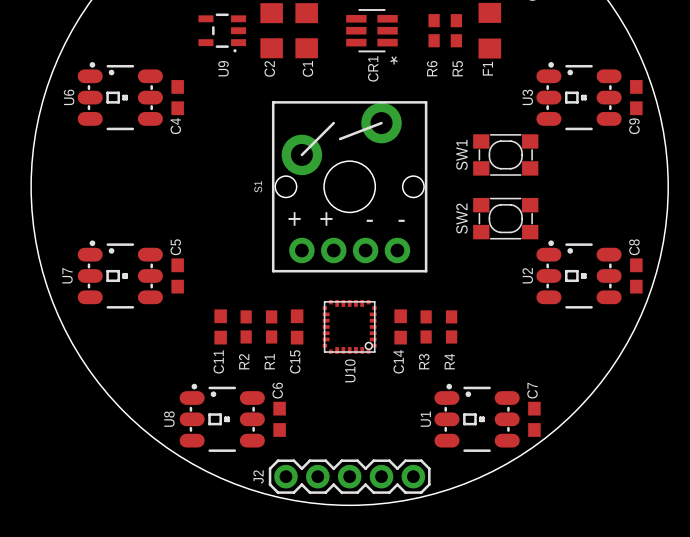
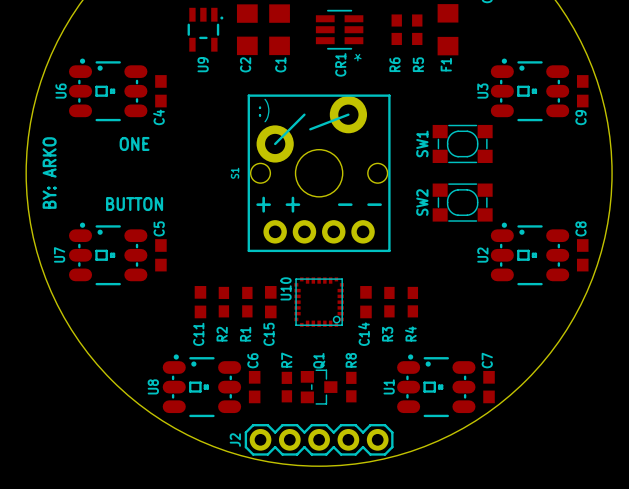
U9 rotation: 0° (222, 32) -> 90° counterclockwise (205, 29)
text: none -> :) (264, 110)
text: none -> ONE (134, 143)
text: none -> BY: ARKO (49, 173)
text: none -> BUTTON (134, 204)
U10 name position: U10 (350, 370) -> U10 (286, 288)
R7: none -> (286, 387)
Q1: none -> (319, 387)
R8: none -> (351, 387)

